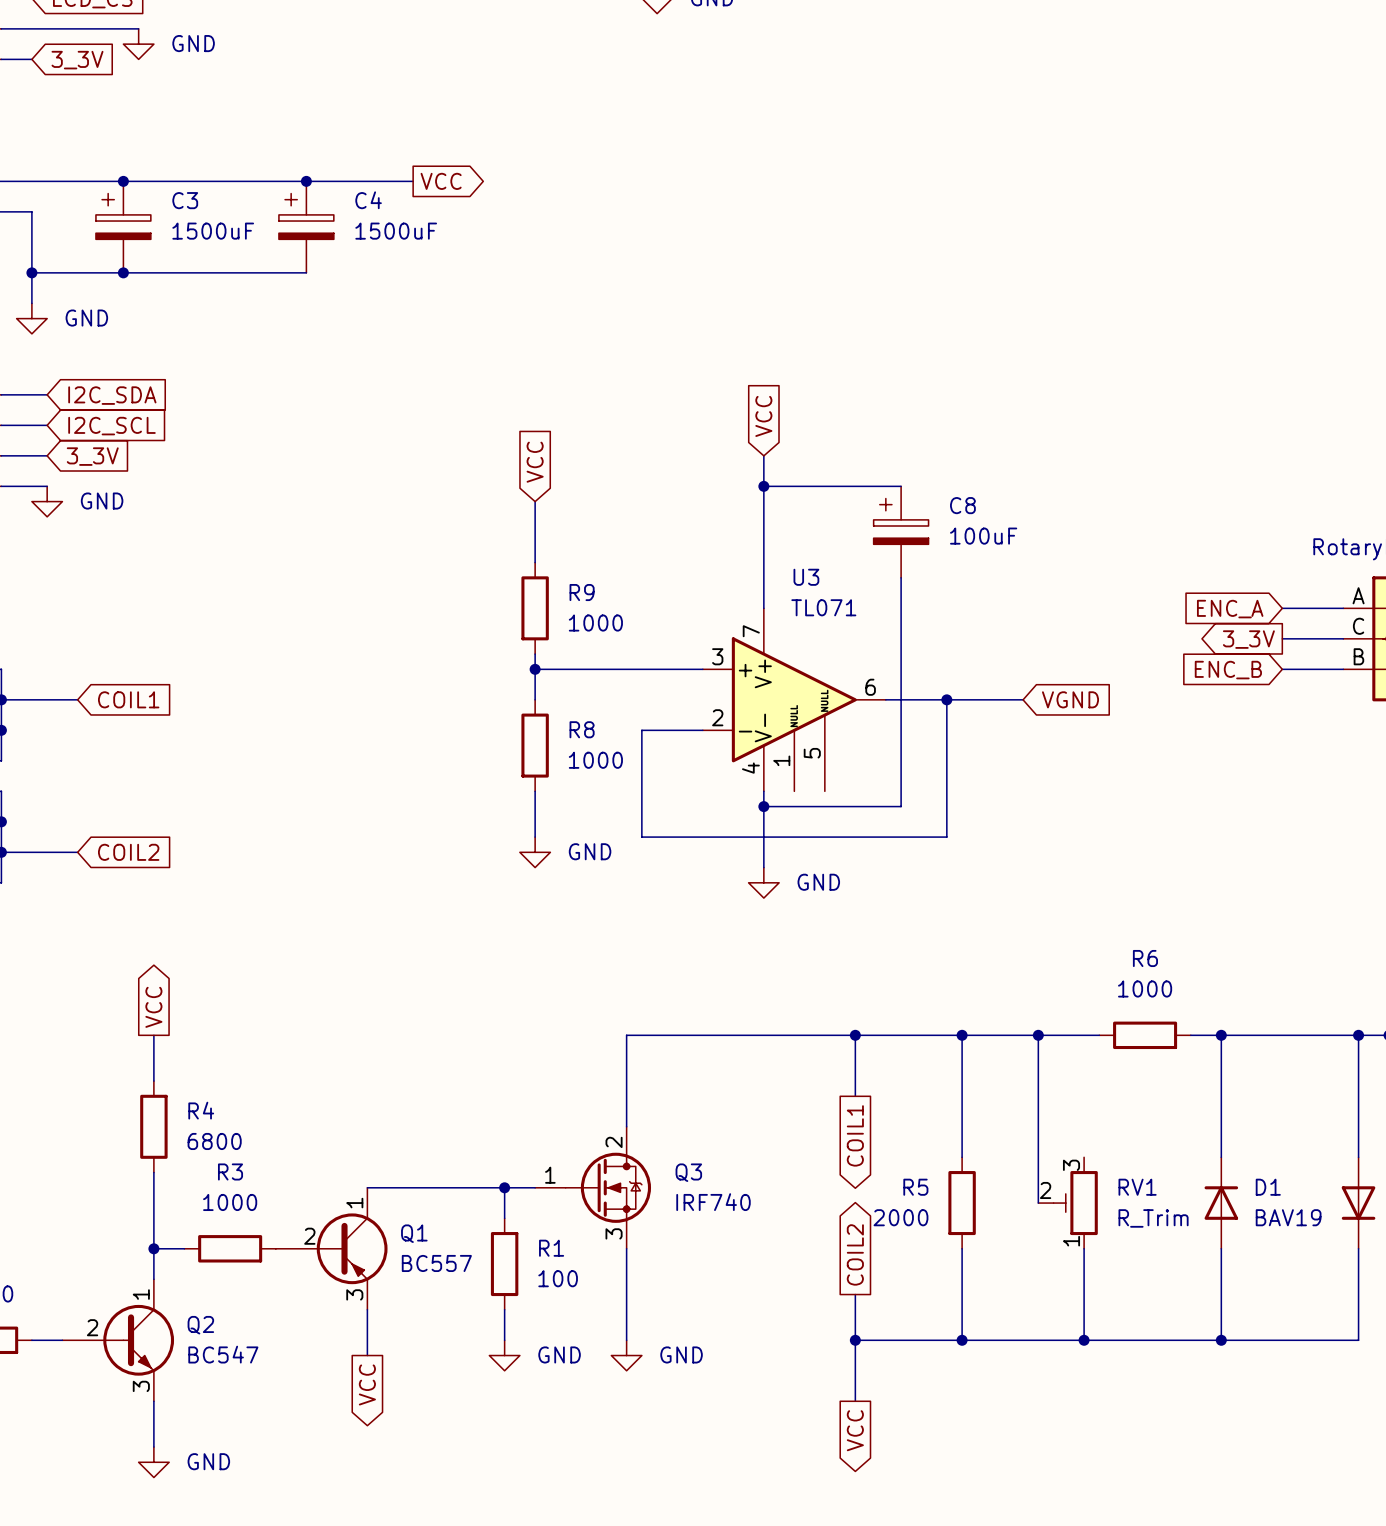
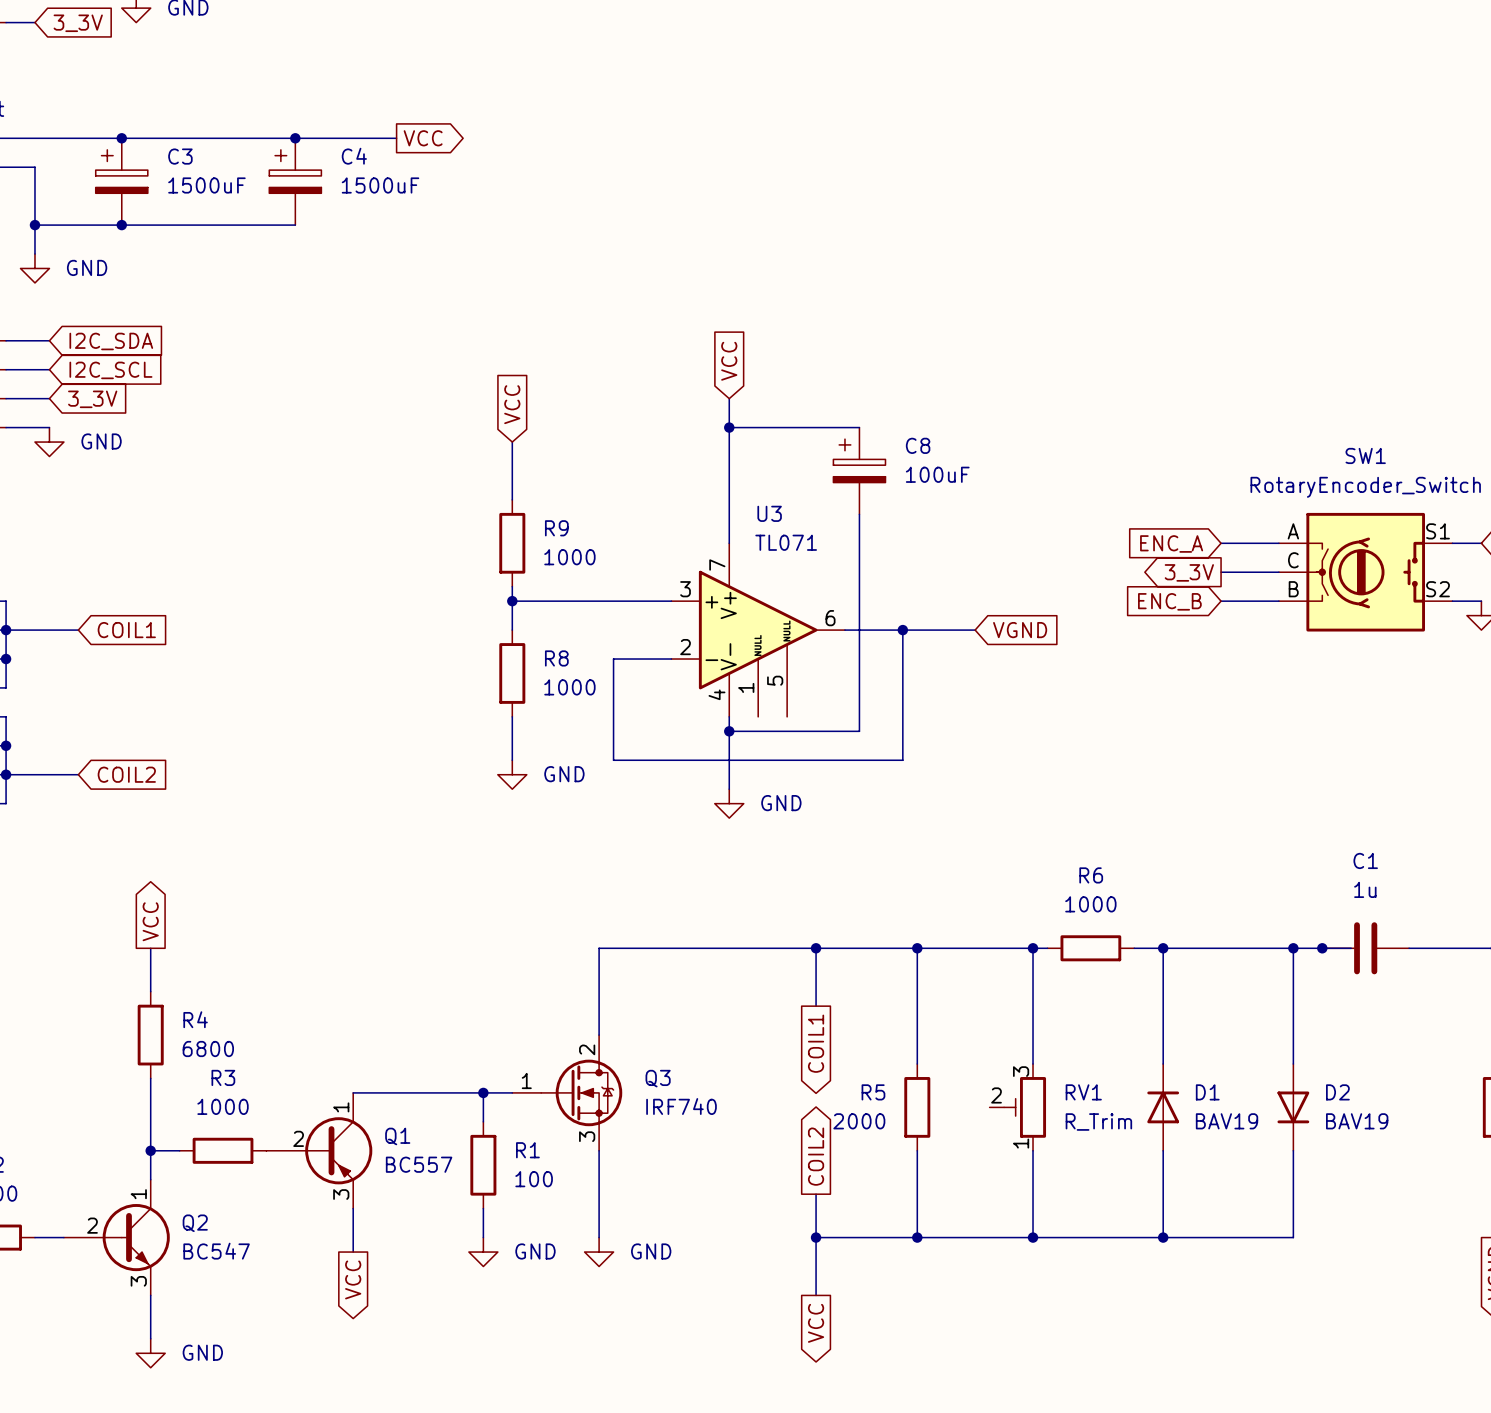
wire: (1038, 1035) (1038, 1203) -> none
junction position: (1038, 1035) -> (1033, 948)
wire: none -> (1033, 948) (1033, 1064)

